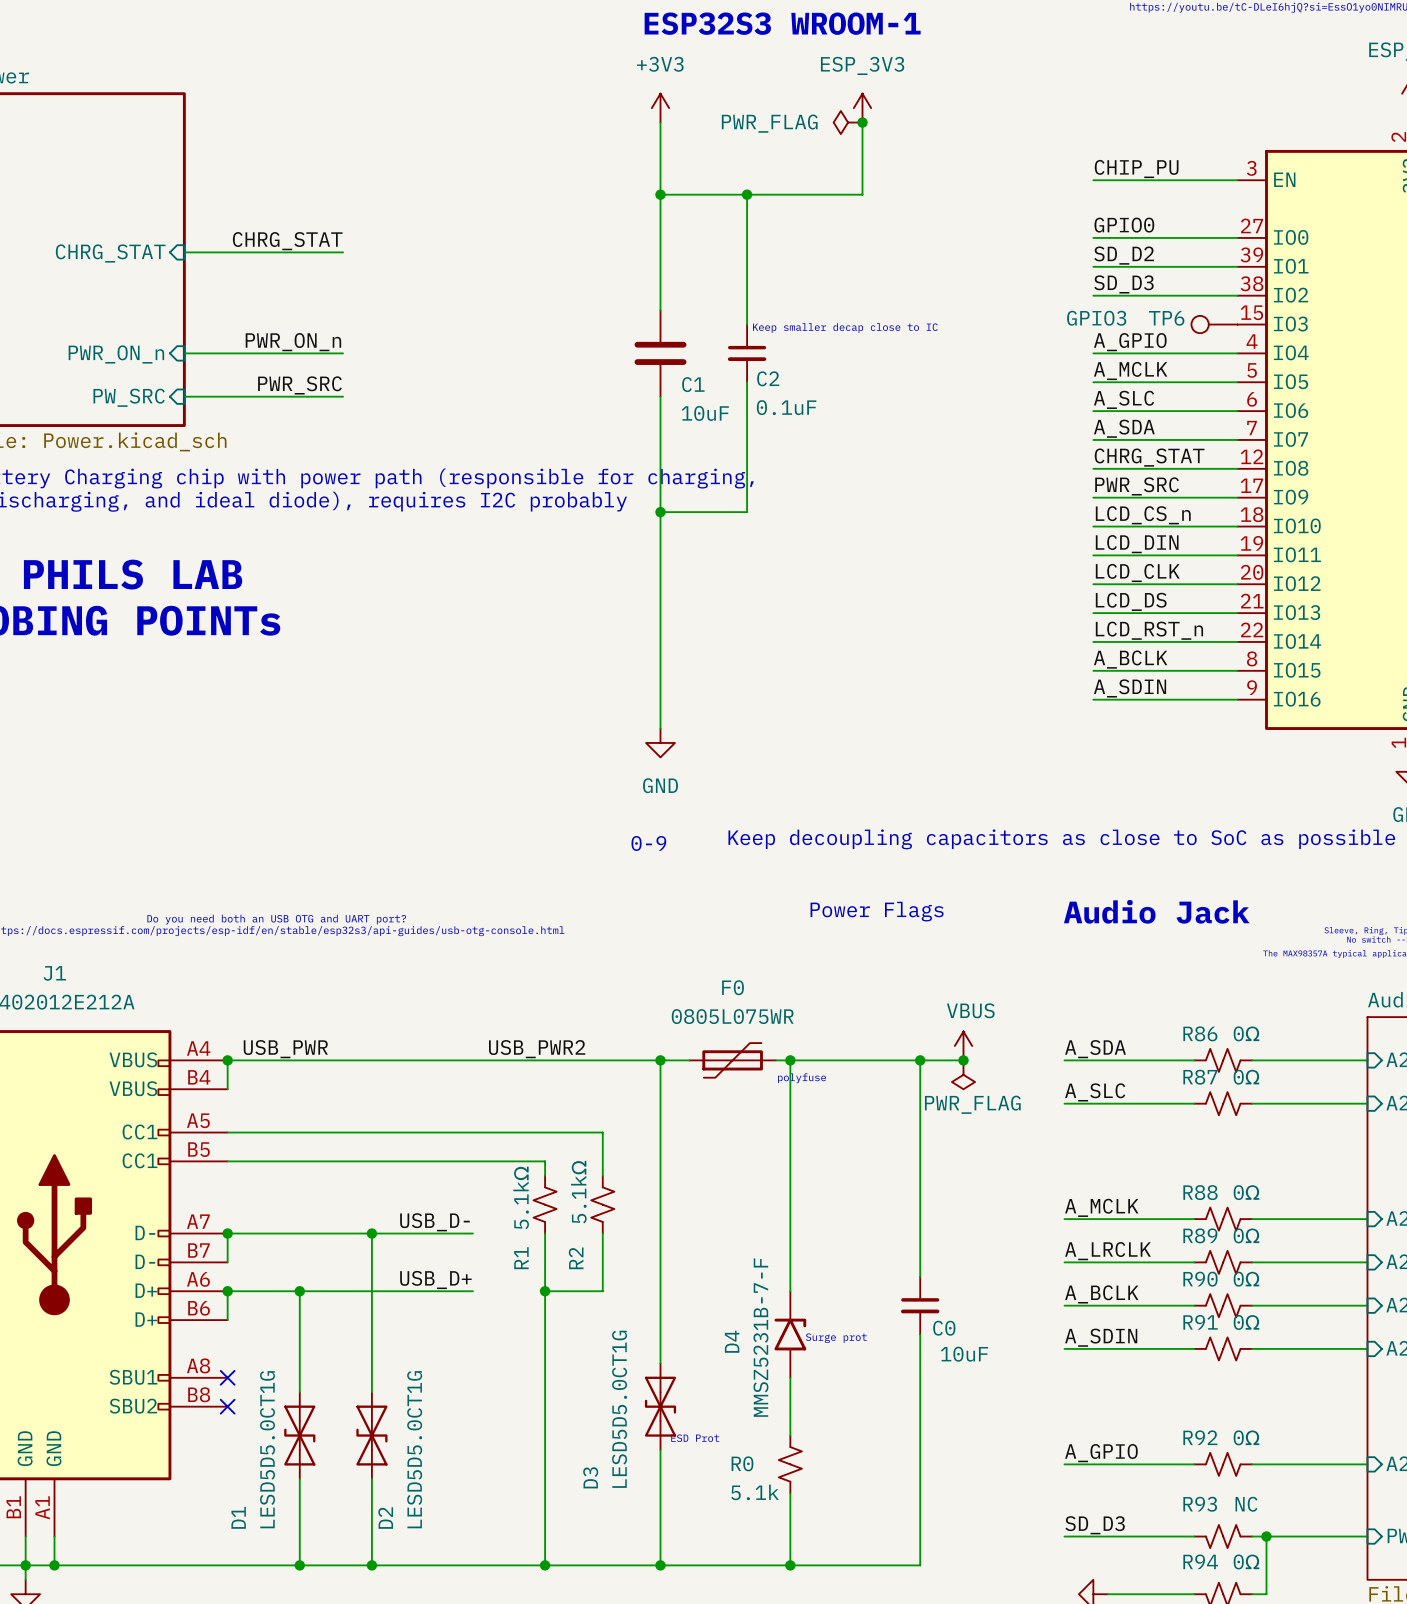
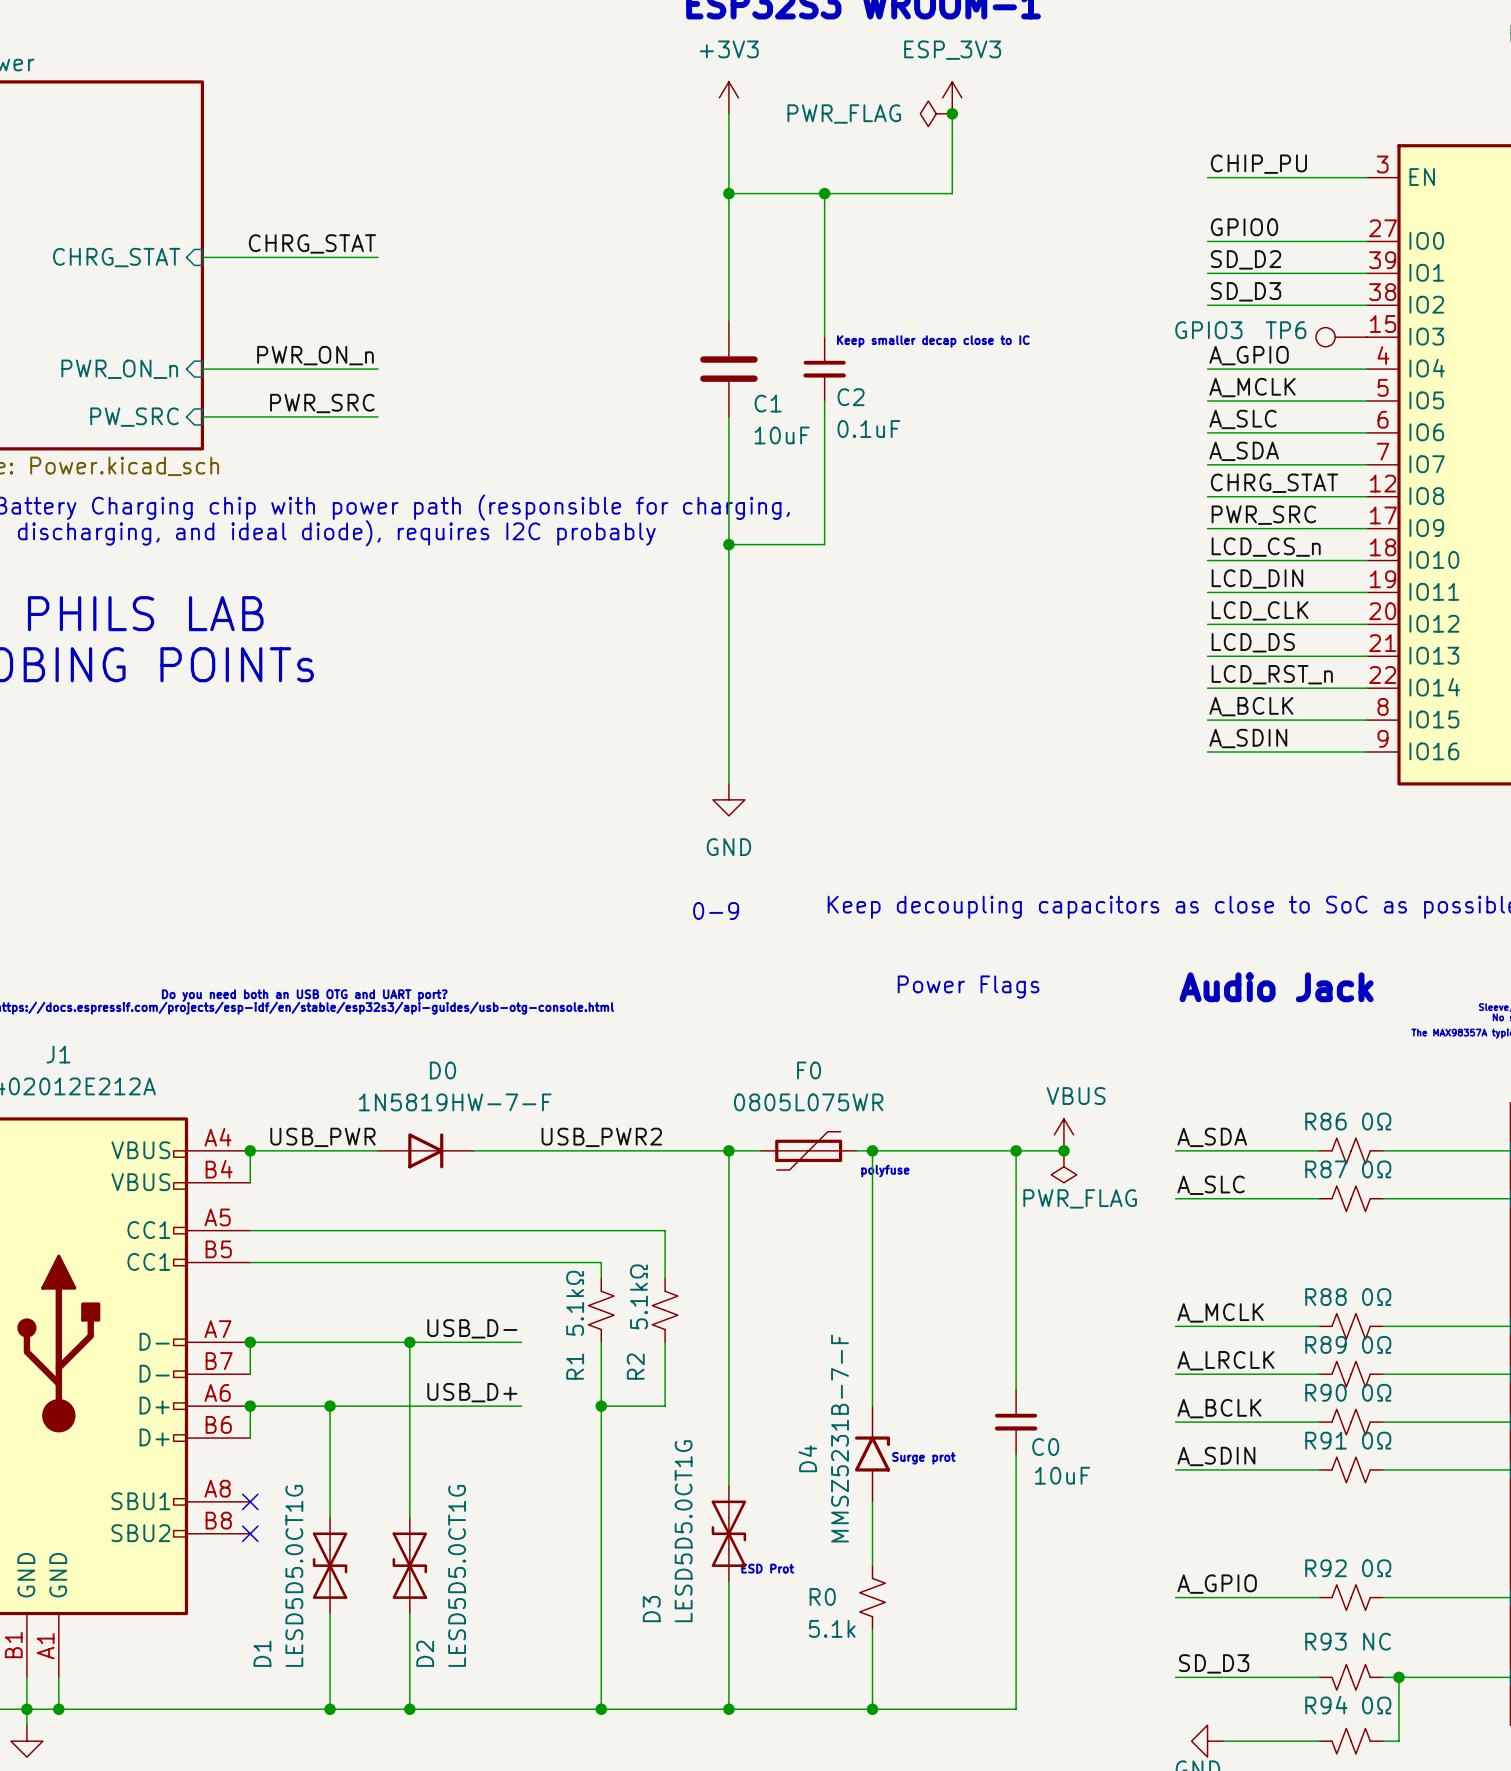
D0: none -> 1N5819HW-7-F (425, 1150)

